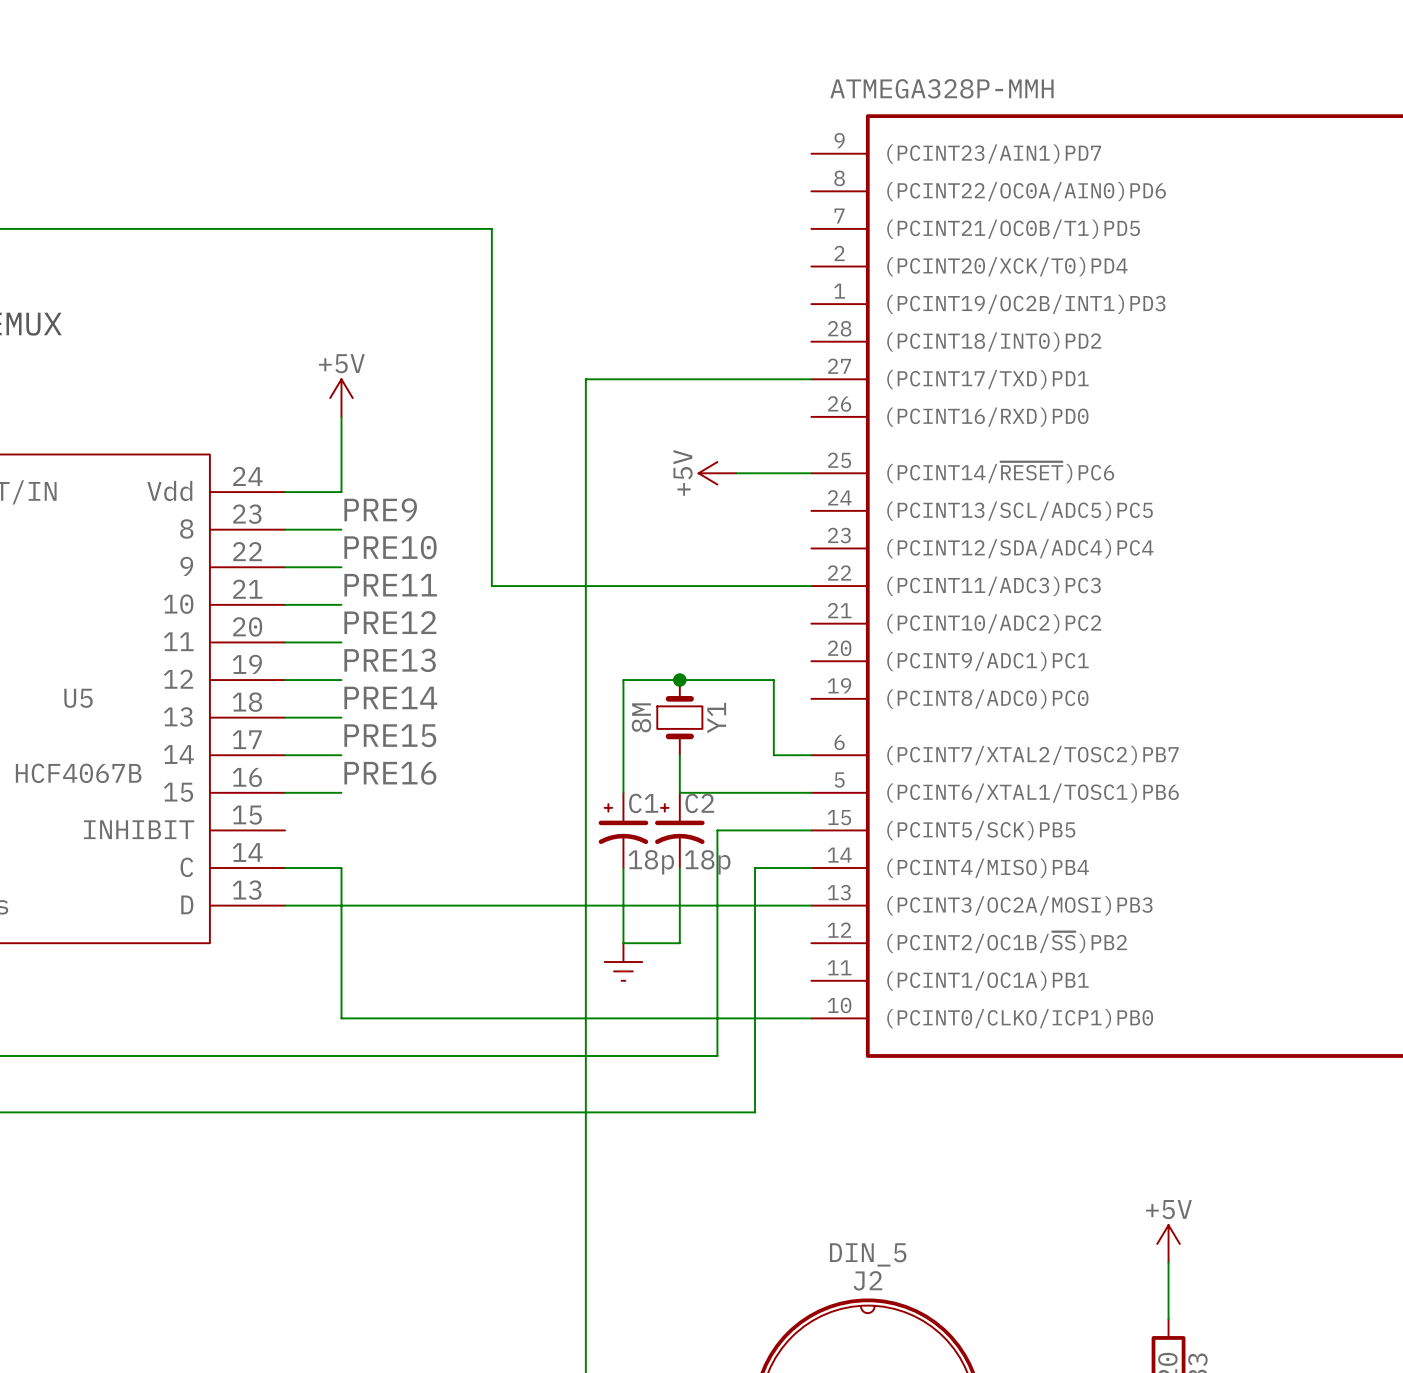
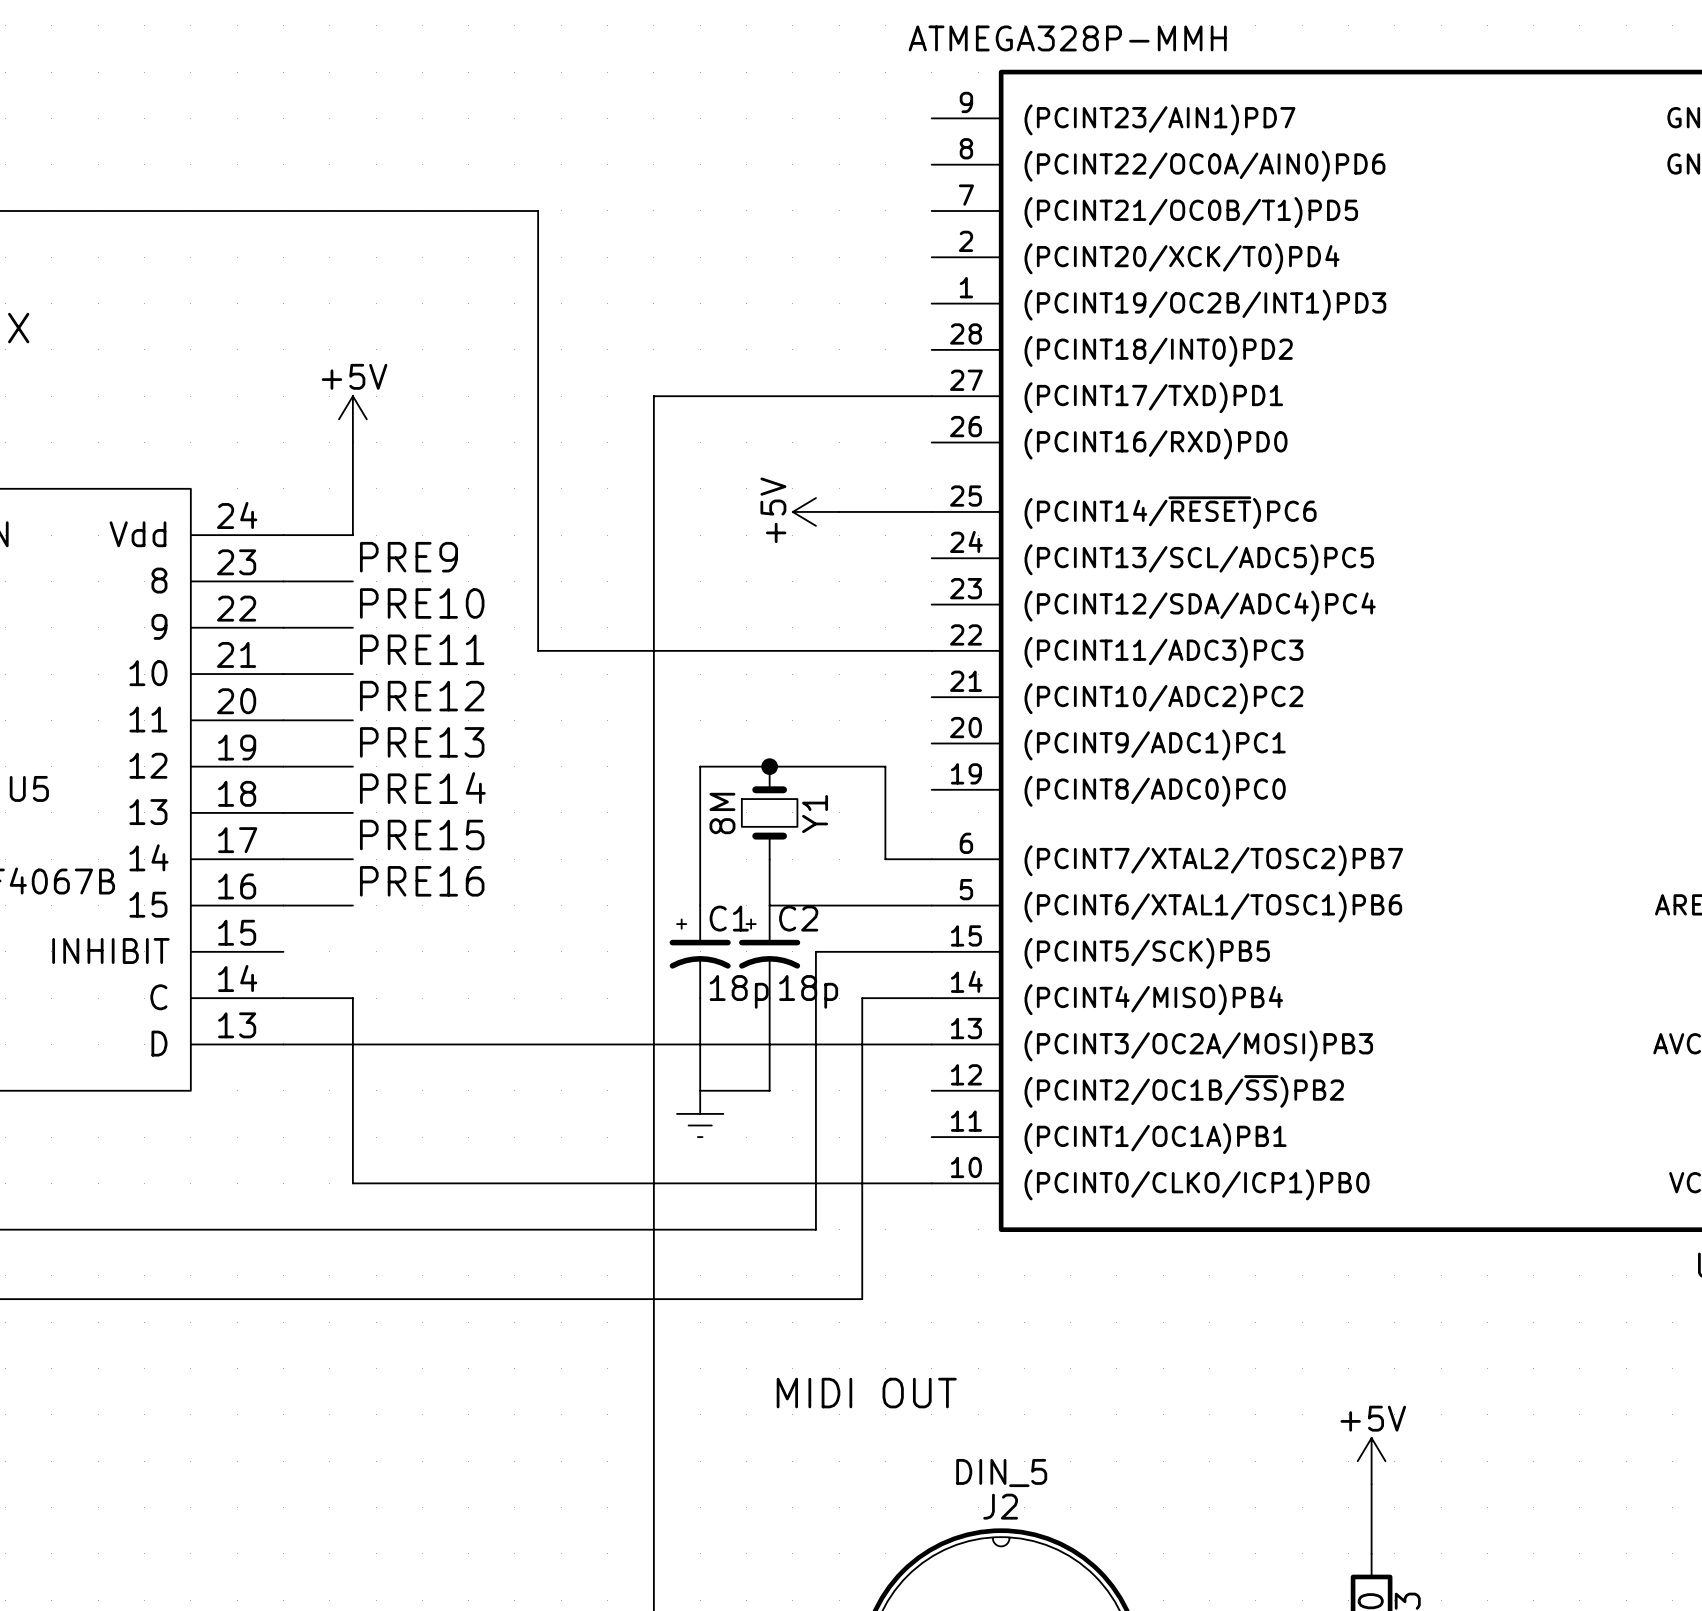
text: none -> MIDI OUT (866, 1393)

